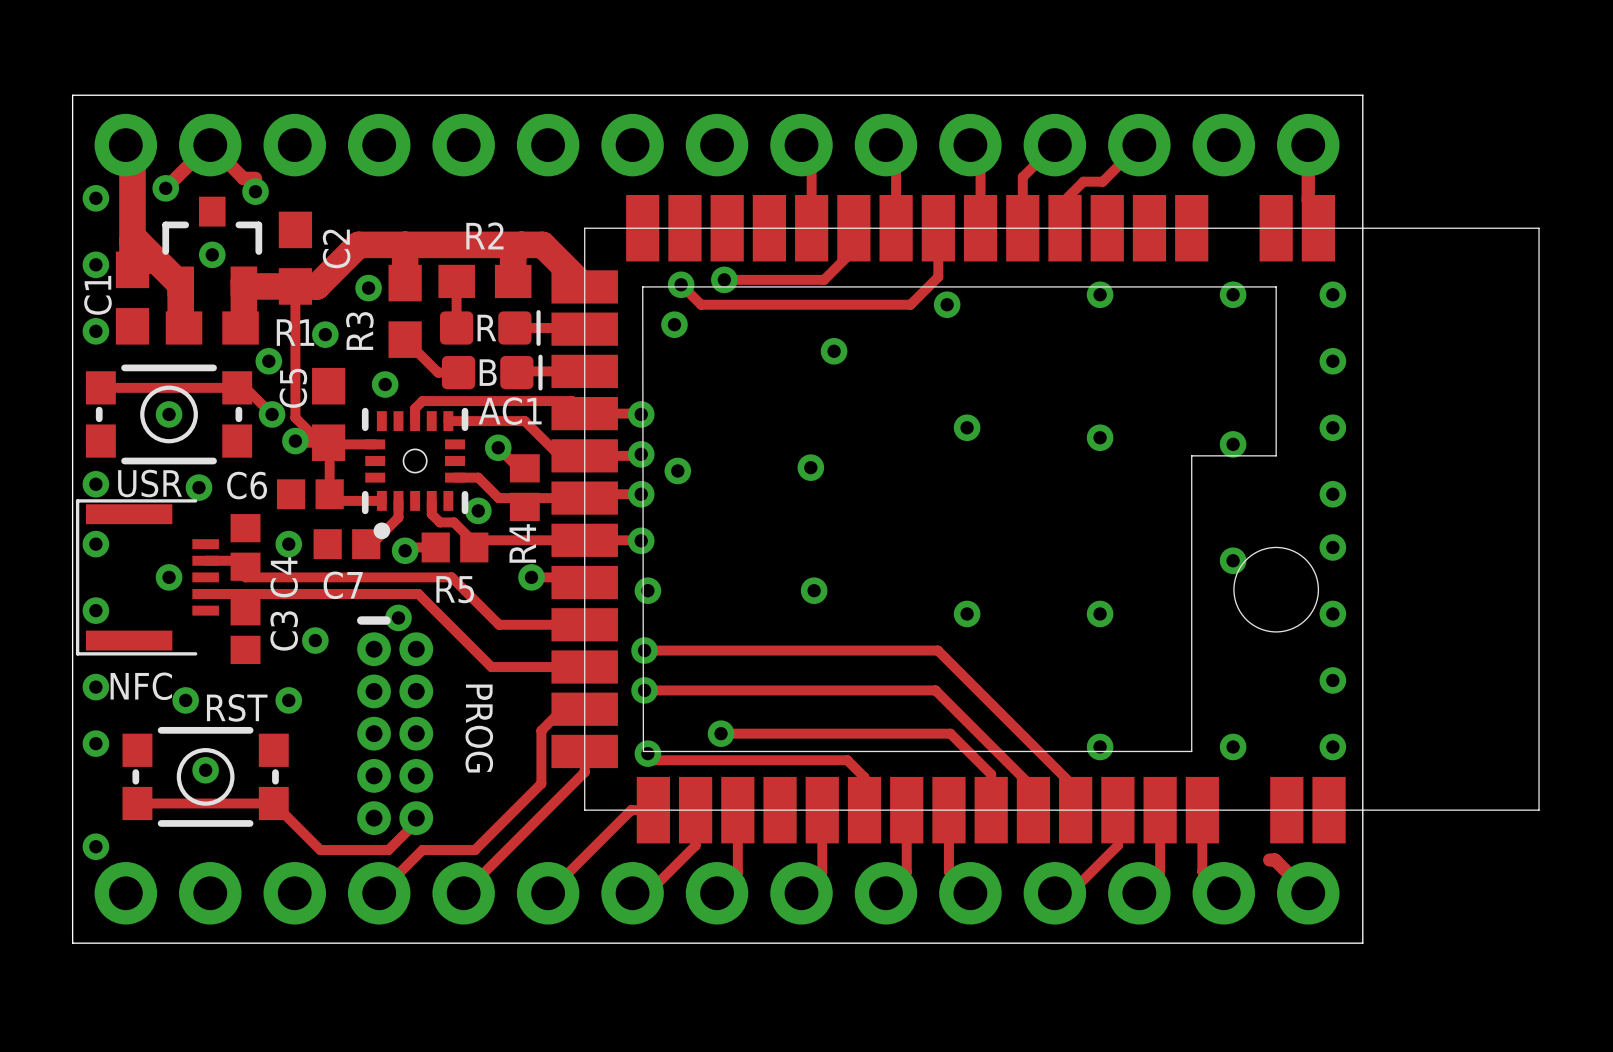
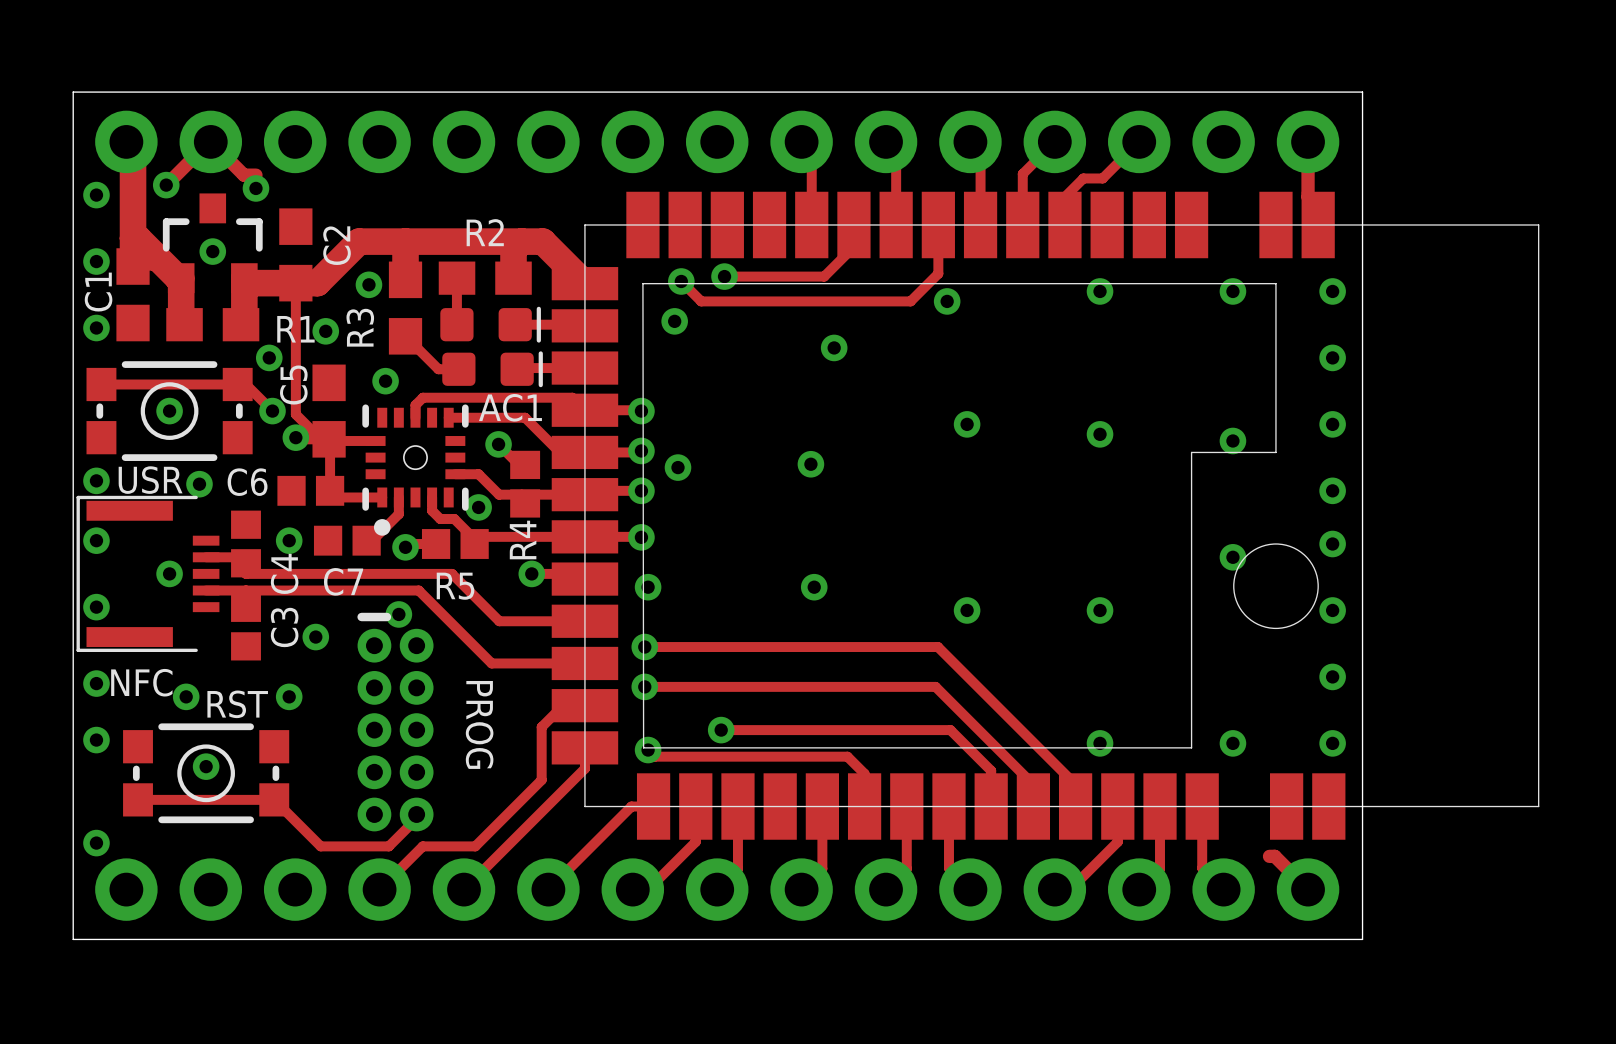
text: R (486, 328) -> none
text: B (488, 372) -> none

